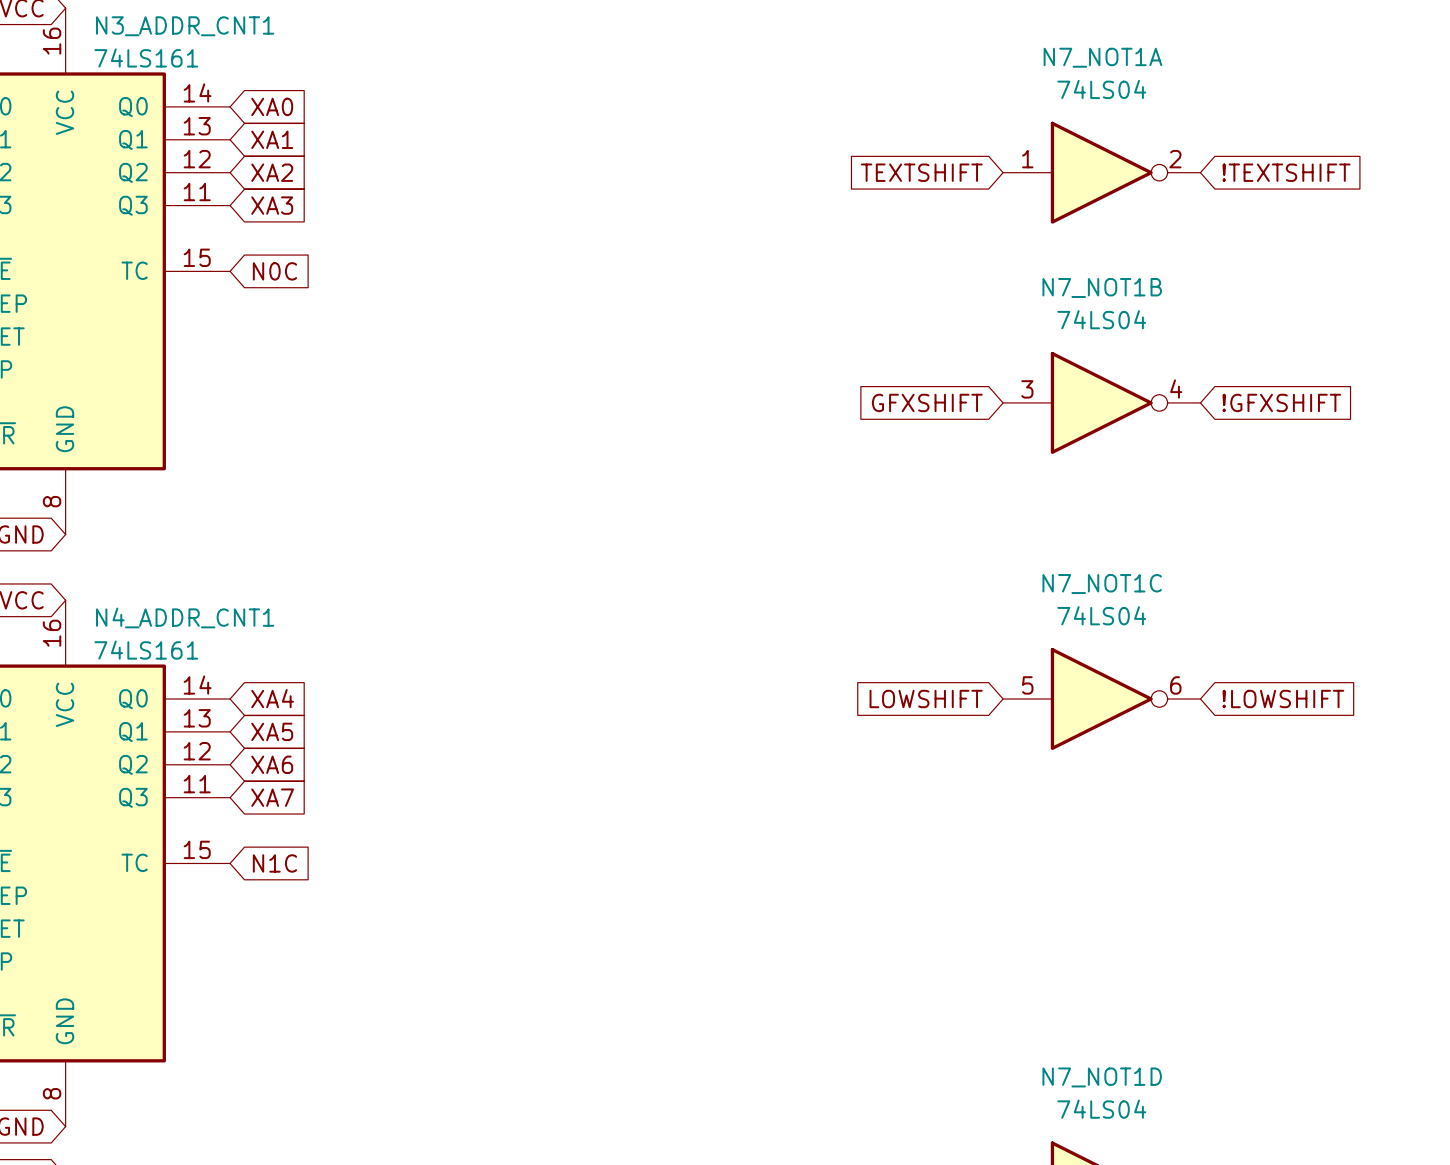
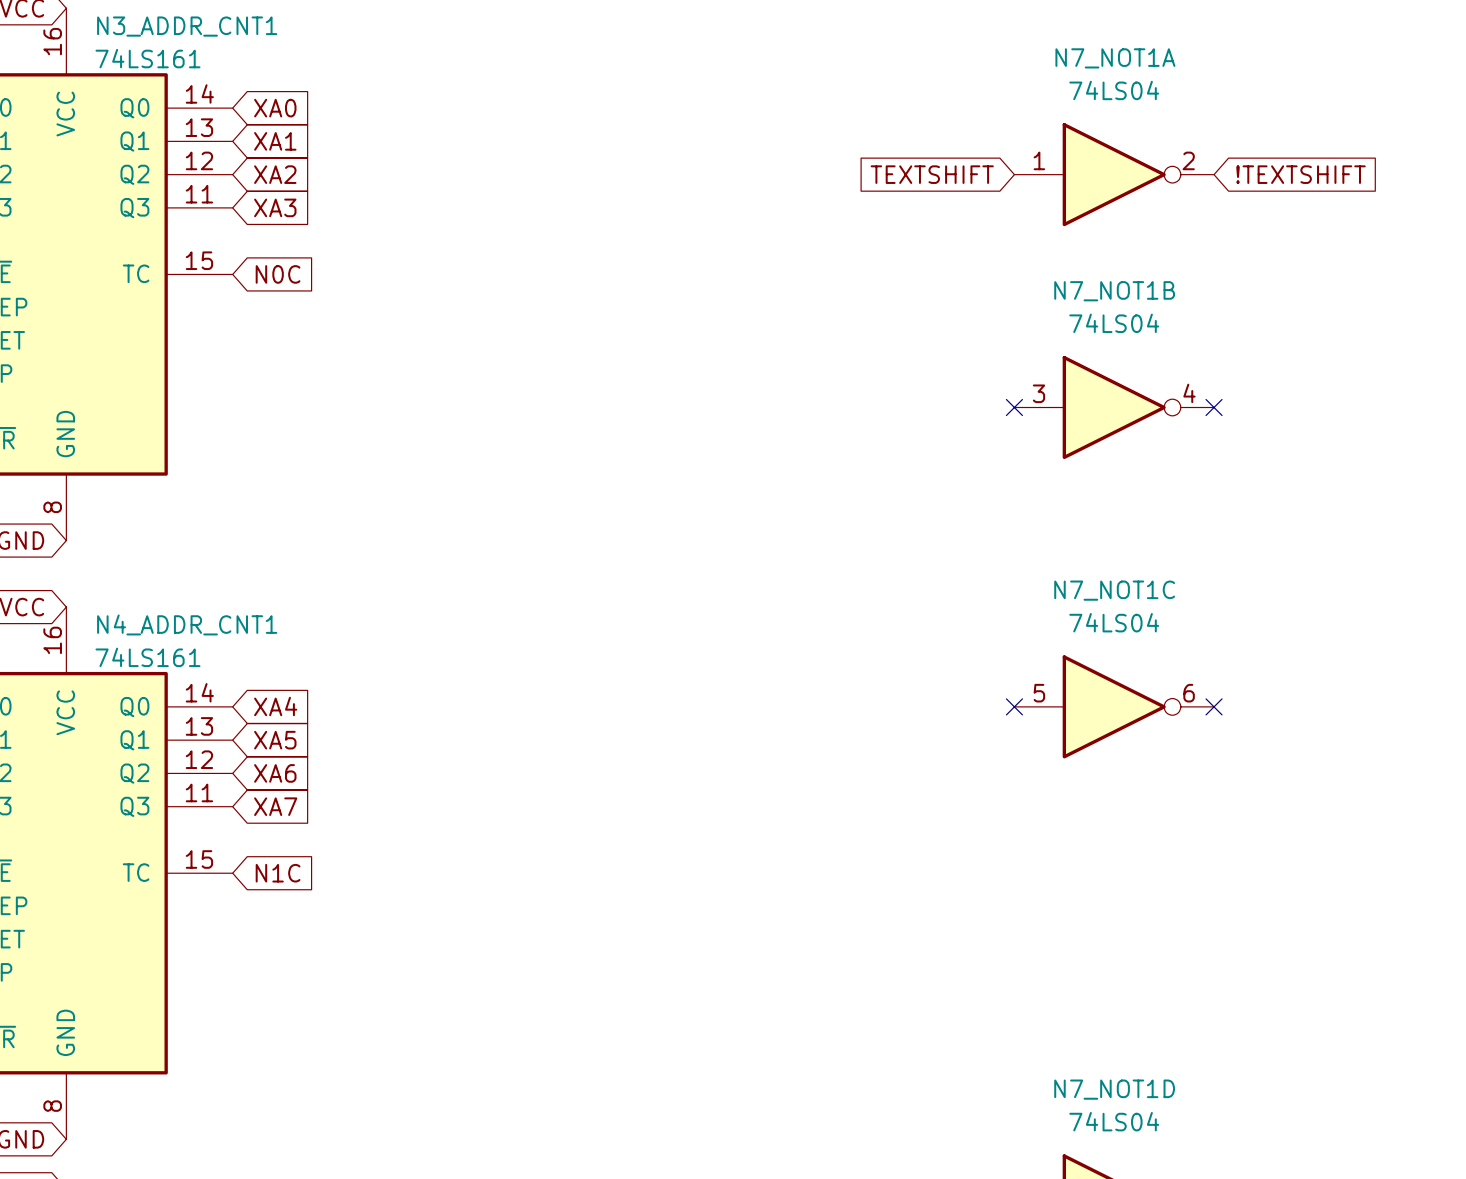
global label: GFXSHIFT (927, 402) -> none
no-connect mark: none -> (1014, 407)
no-connect mark: none -> (1214, 407)
global label: !GFXSHIFT (1281, 402) -> none
global label: LOWSHIFT (926, 699) -> none
no-connect mark: none -> (1014, 706)
no-connect mark: none -> (1214, 706)
global label: !LOWSHIFT (1283, 699) -> none

